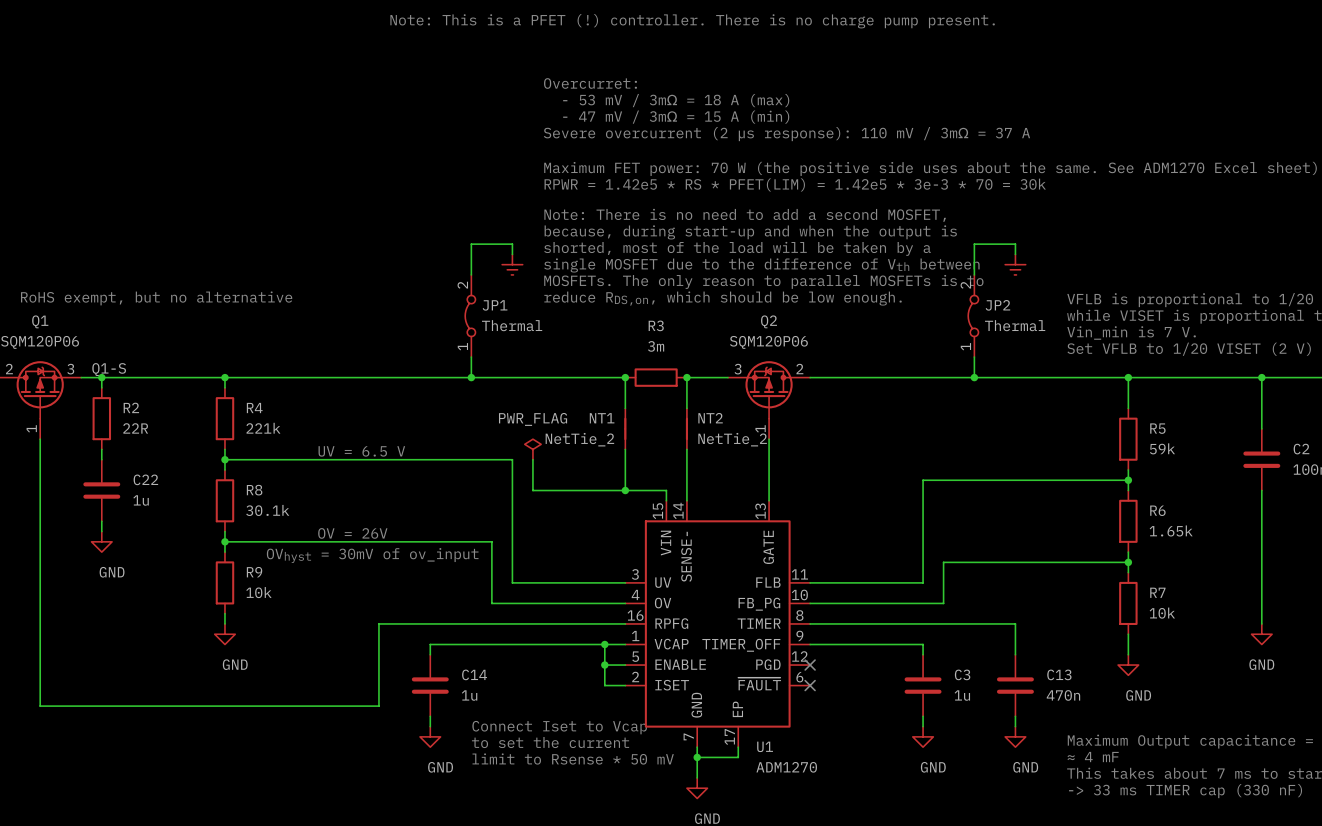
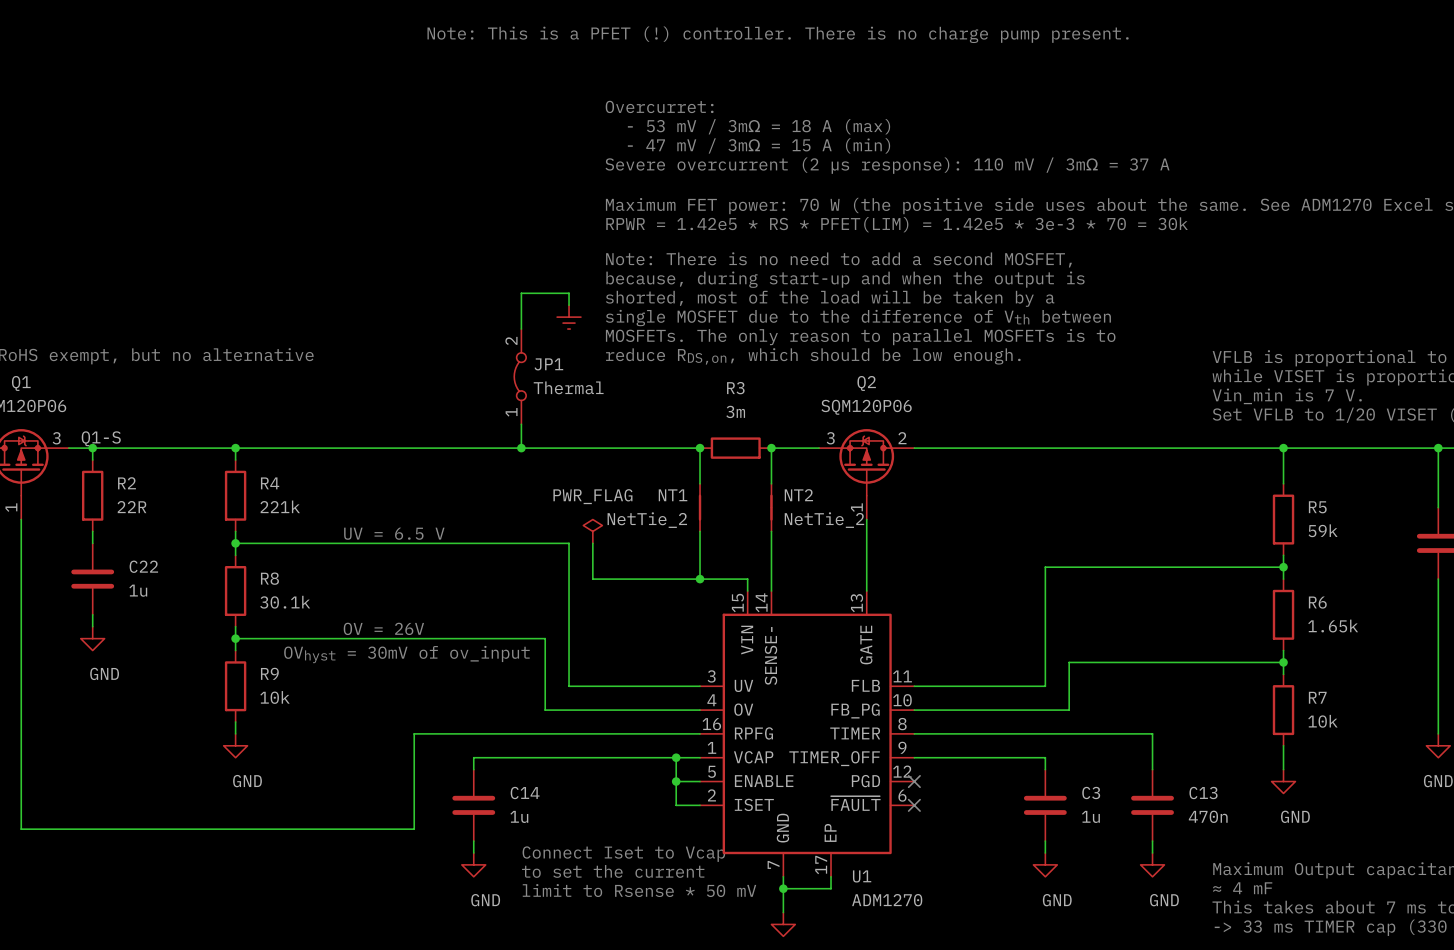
wire: (1015, 254) (1015, 244) (974, 244) (974, 274) -> none
power symbol: (1015, 264) -> none
JP2: Thermal (973, 316) -> none
wire: (974, 357) (974, 377) -> none
junction: (974, 377) -> none

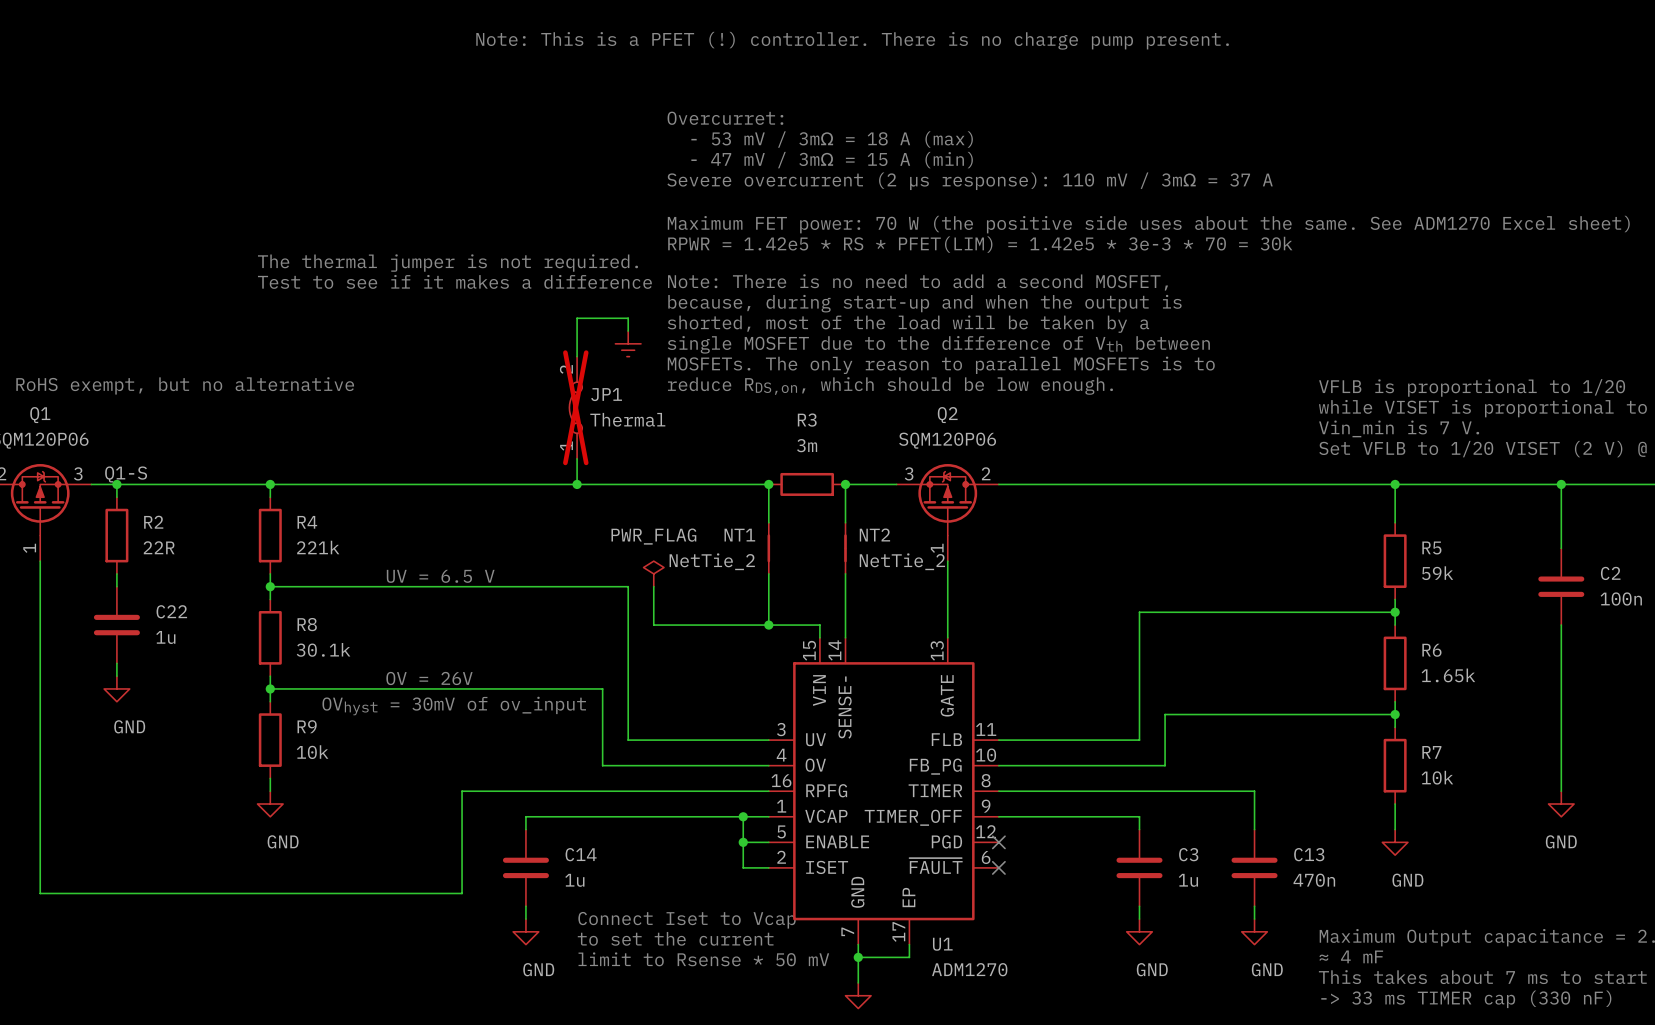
text: none -> The thermal jumper is not required. (447, 263)
text: none -> Test to see if it makes a difference (454, 281)
JP1 do-not-place cross: none -> (575, 407)

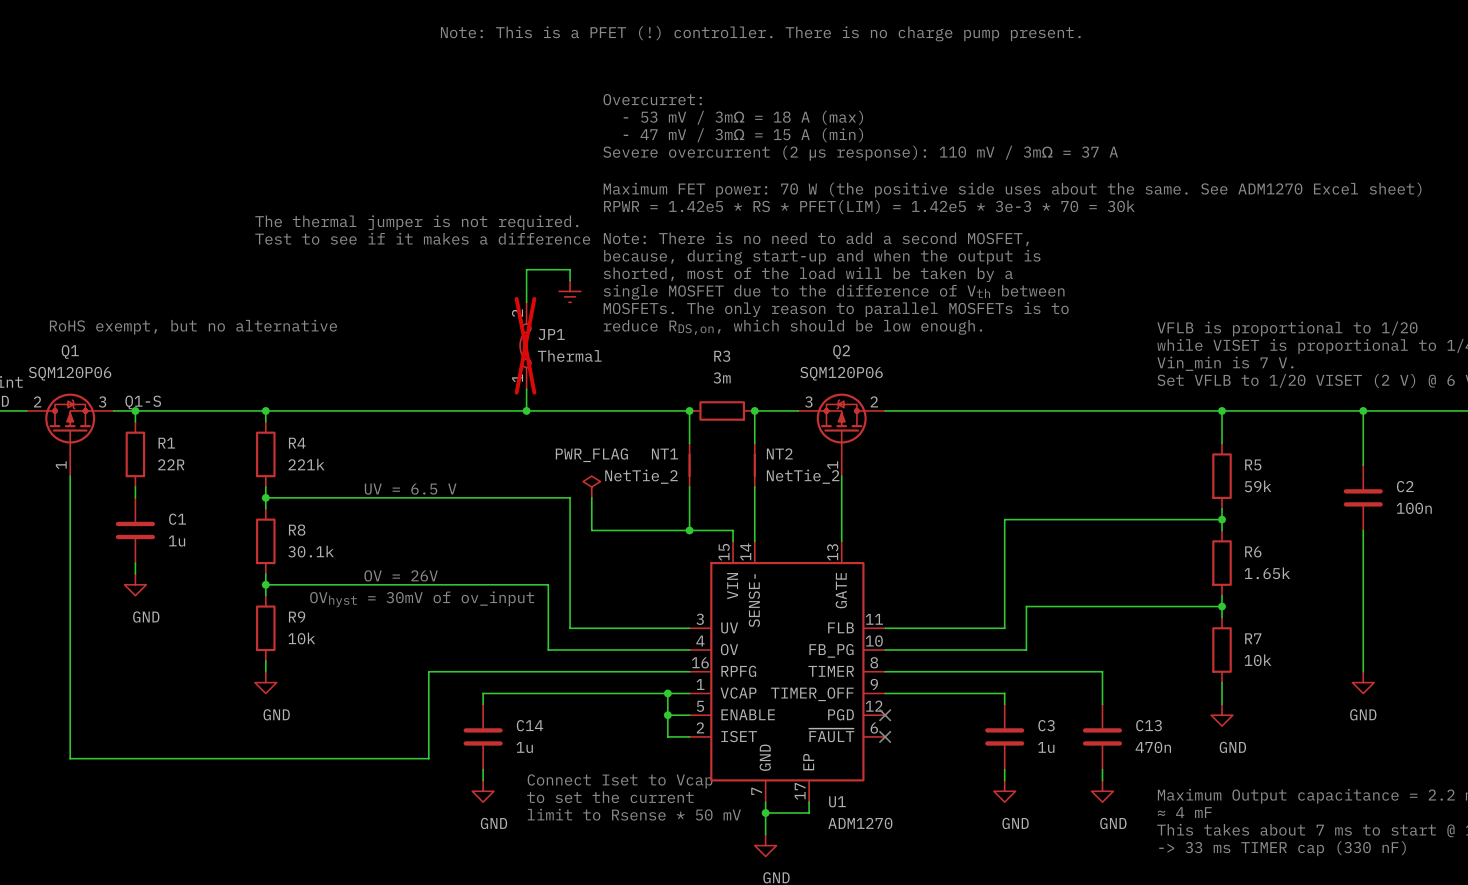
R2 name: R2 (153, 522) -> R1 (166, 443)
C22 name: C22 (171, 611) -> C1 (177, 519)

